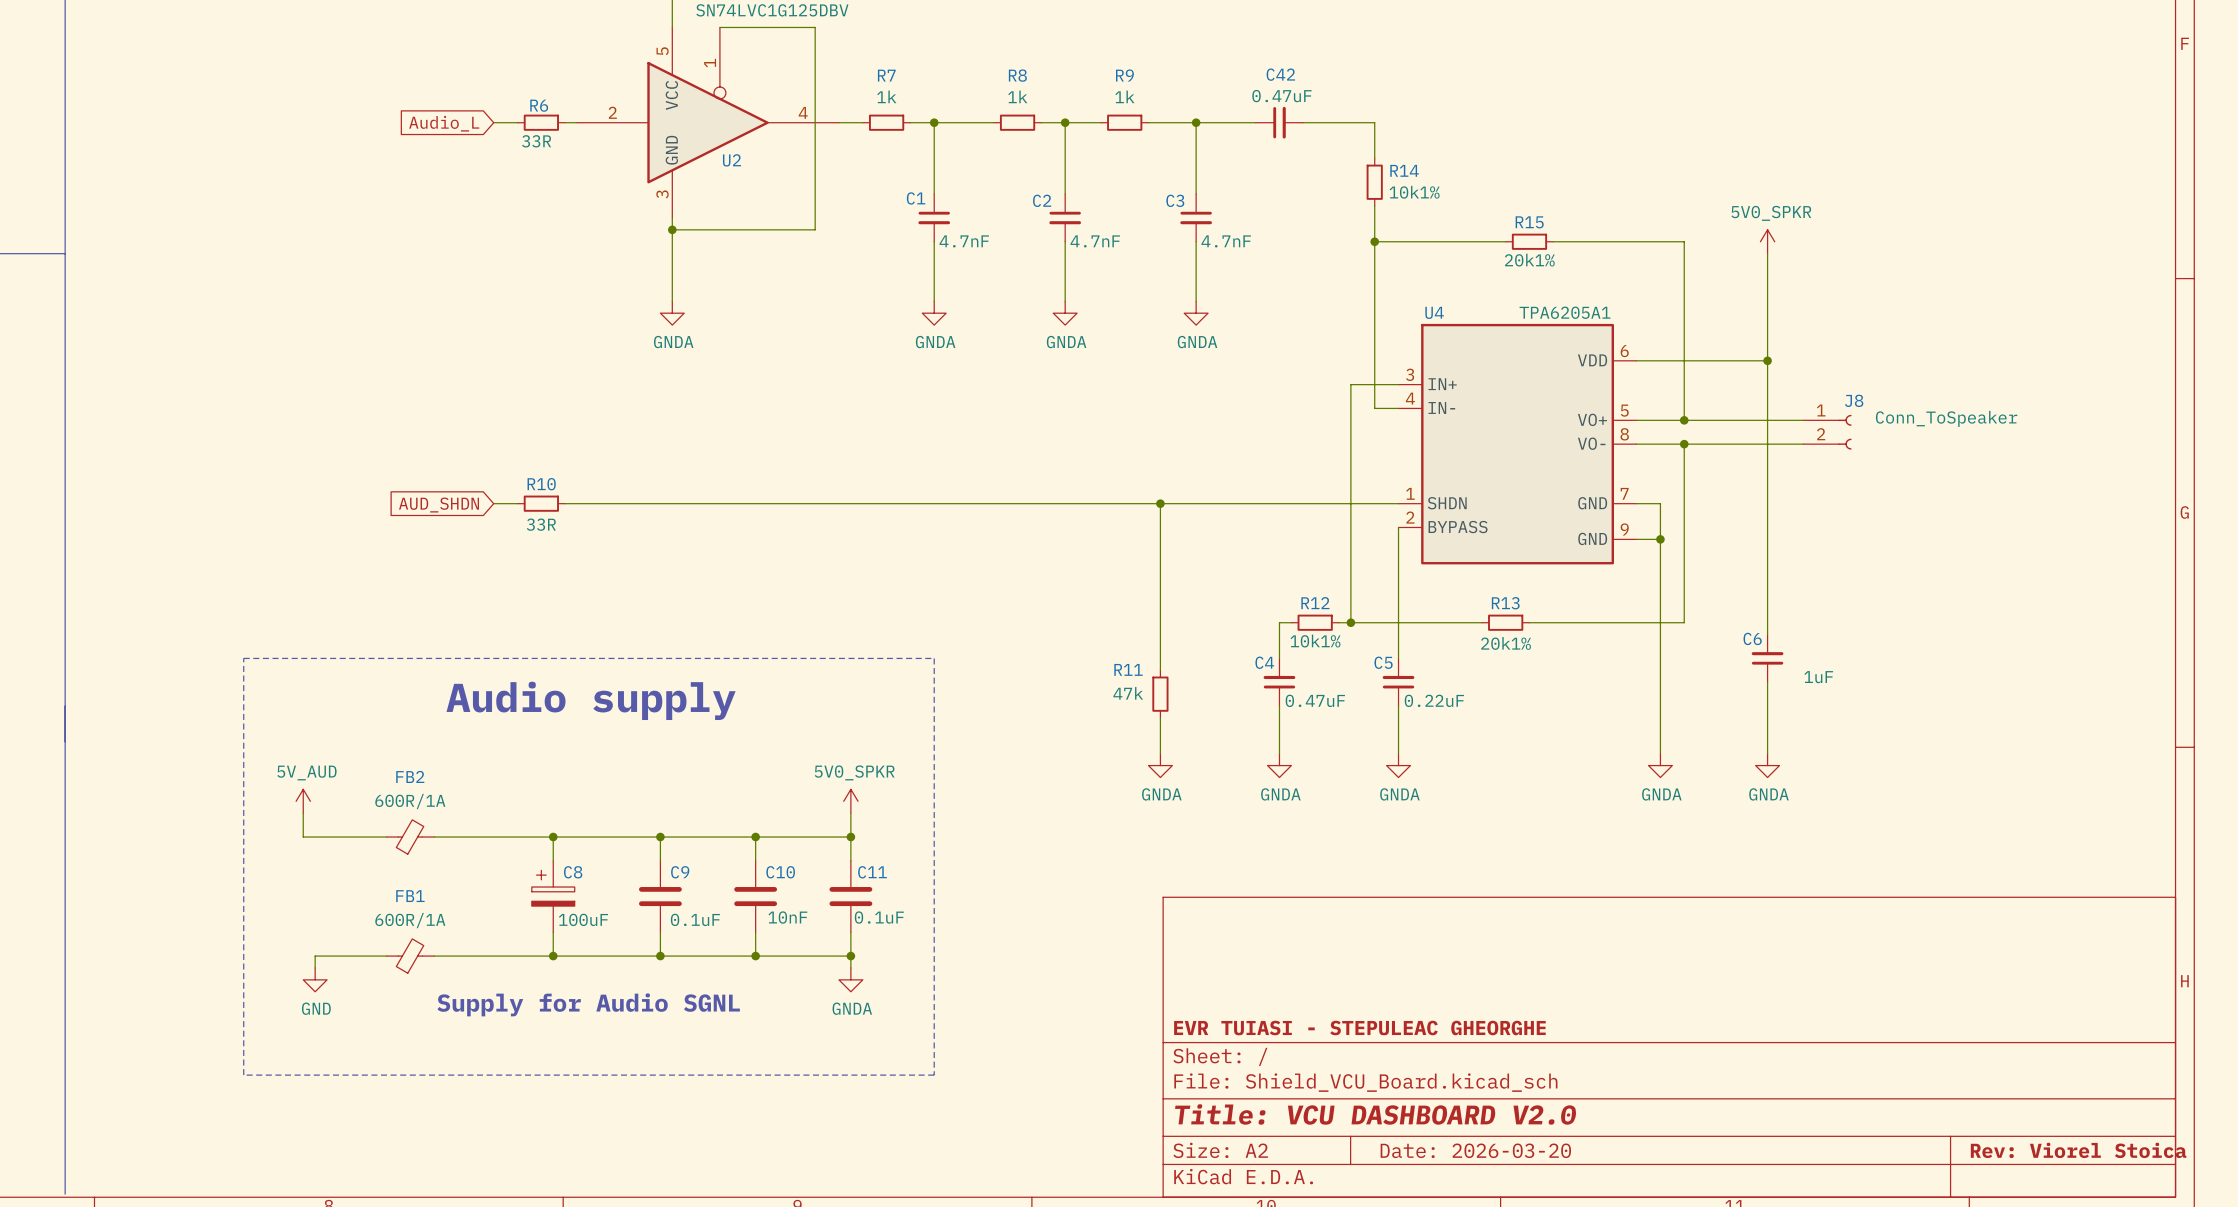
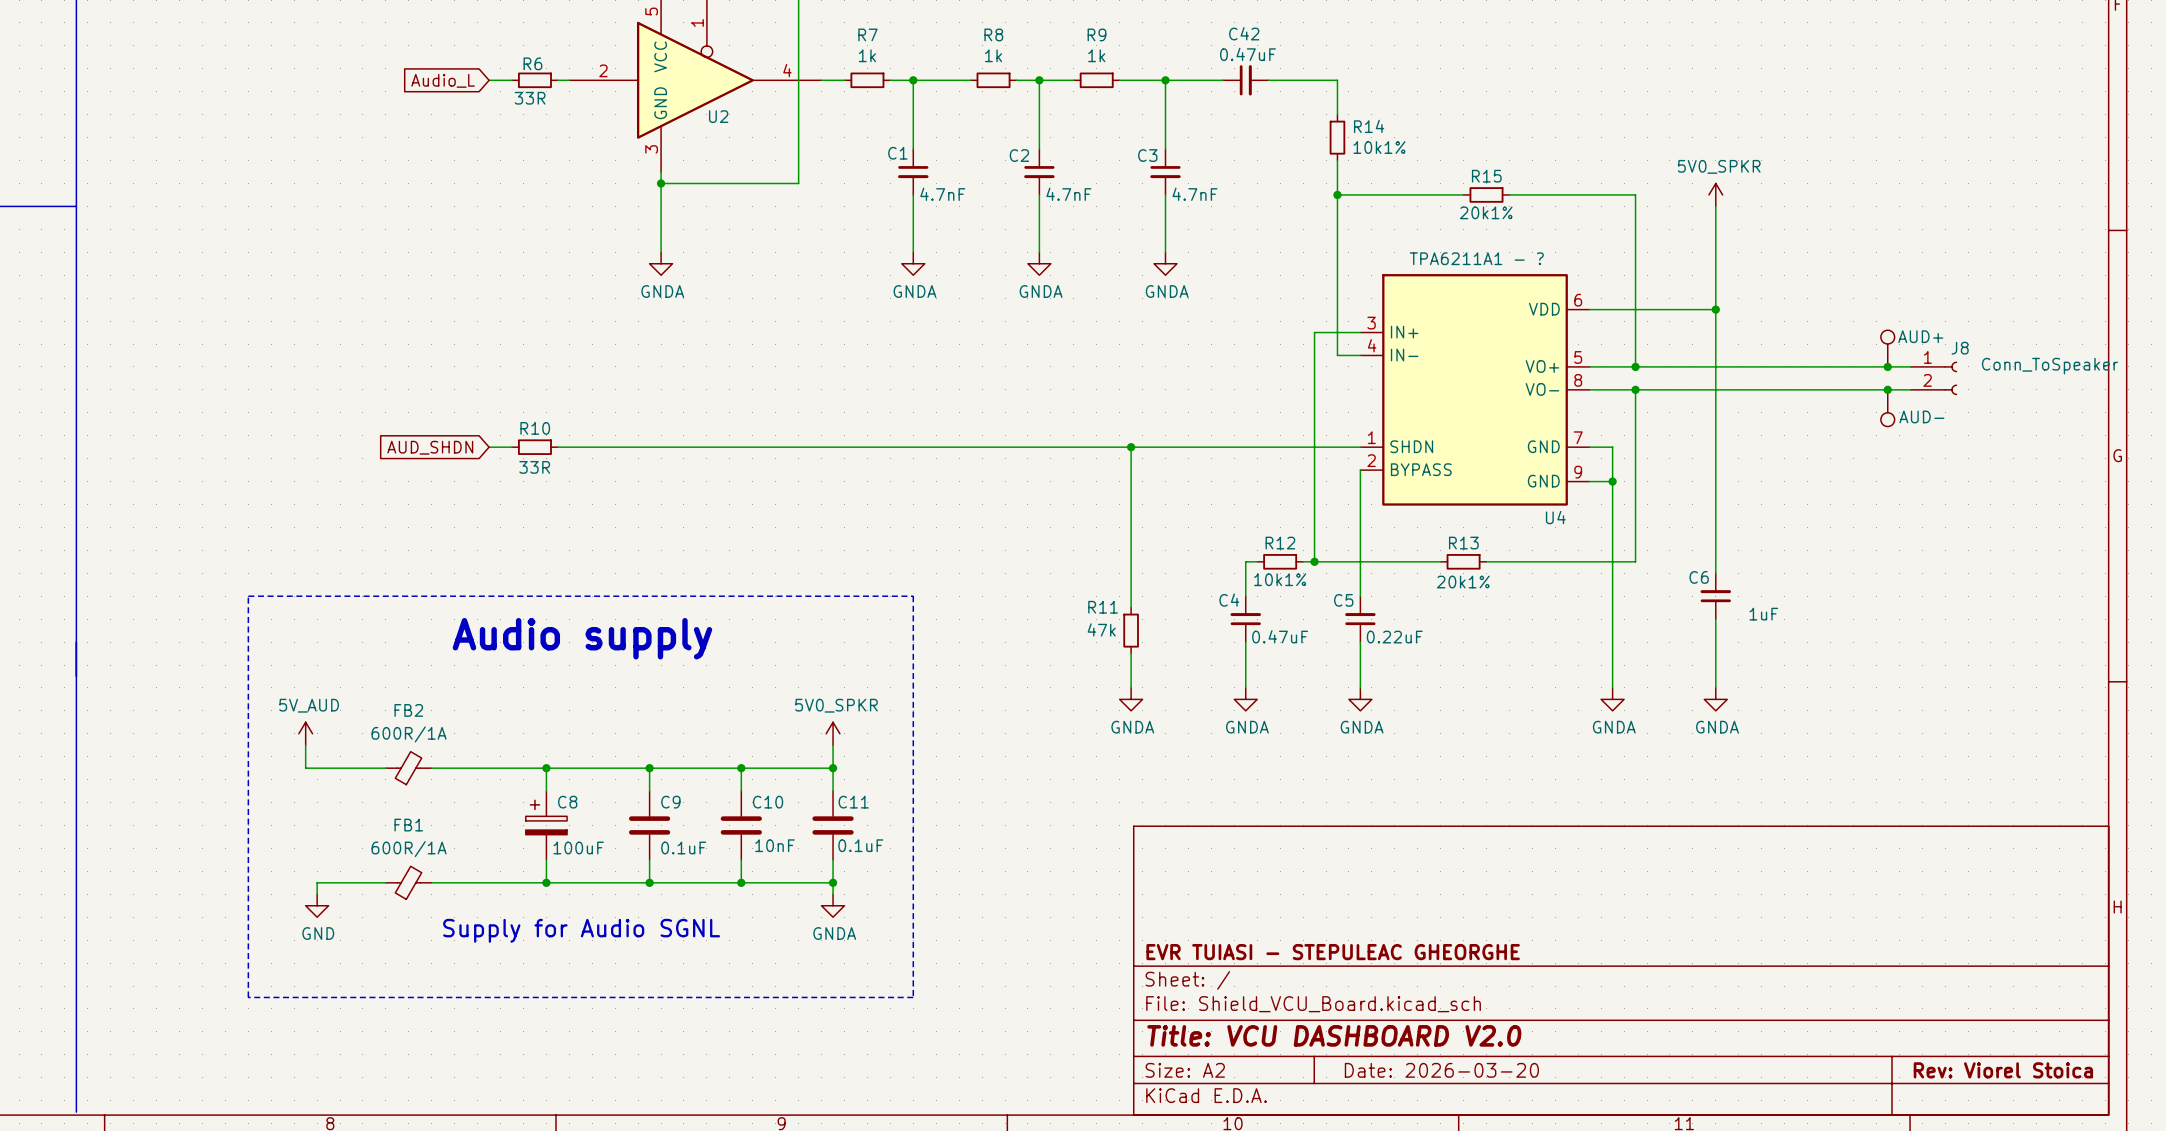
U4 name position: U4 (1434, 312) -> U4 (1555, 517)
U4 value: TPA6205A1 (1565, 312) -> TPA6211A1 - ? (1476, 258)
part: none -> AUD+ (1887, 348)
wire: none -> (1750, 366) (1910, 366)
junction: none -> (1887, 366)
J8 position: (1827, 432) -> (1933, 378)
wire: none -> (1750, 389) (1910, 389)
junction: none -> (1887, 389)
part: none -> AUD- (1887, 408)

